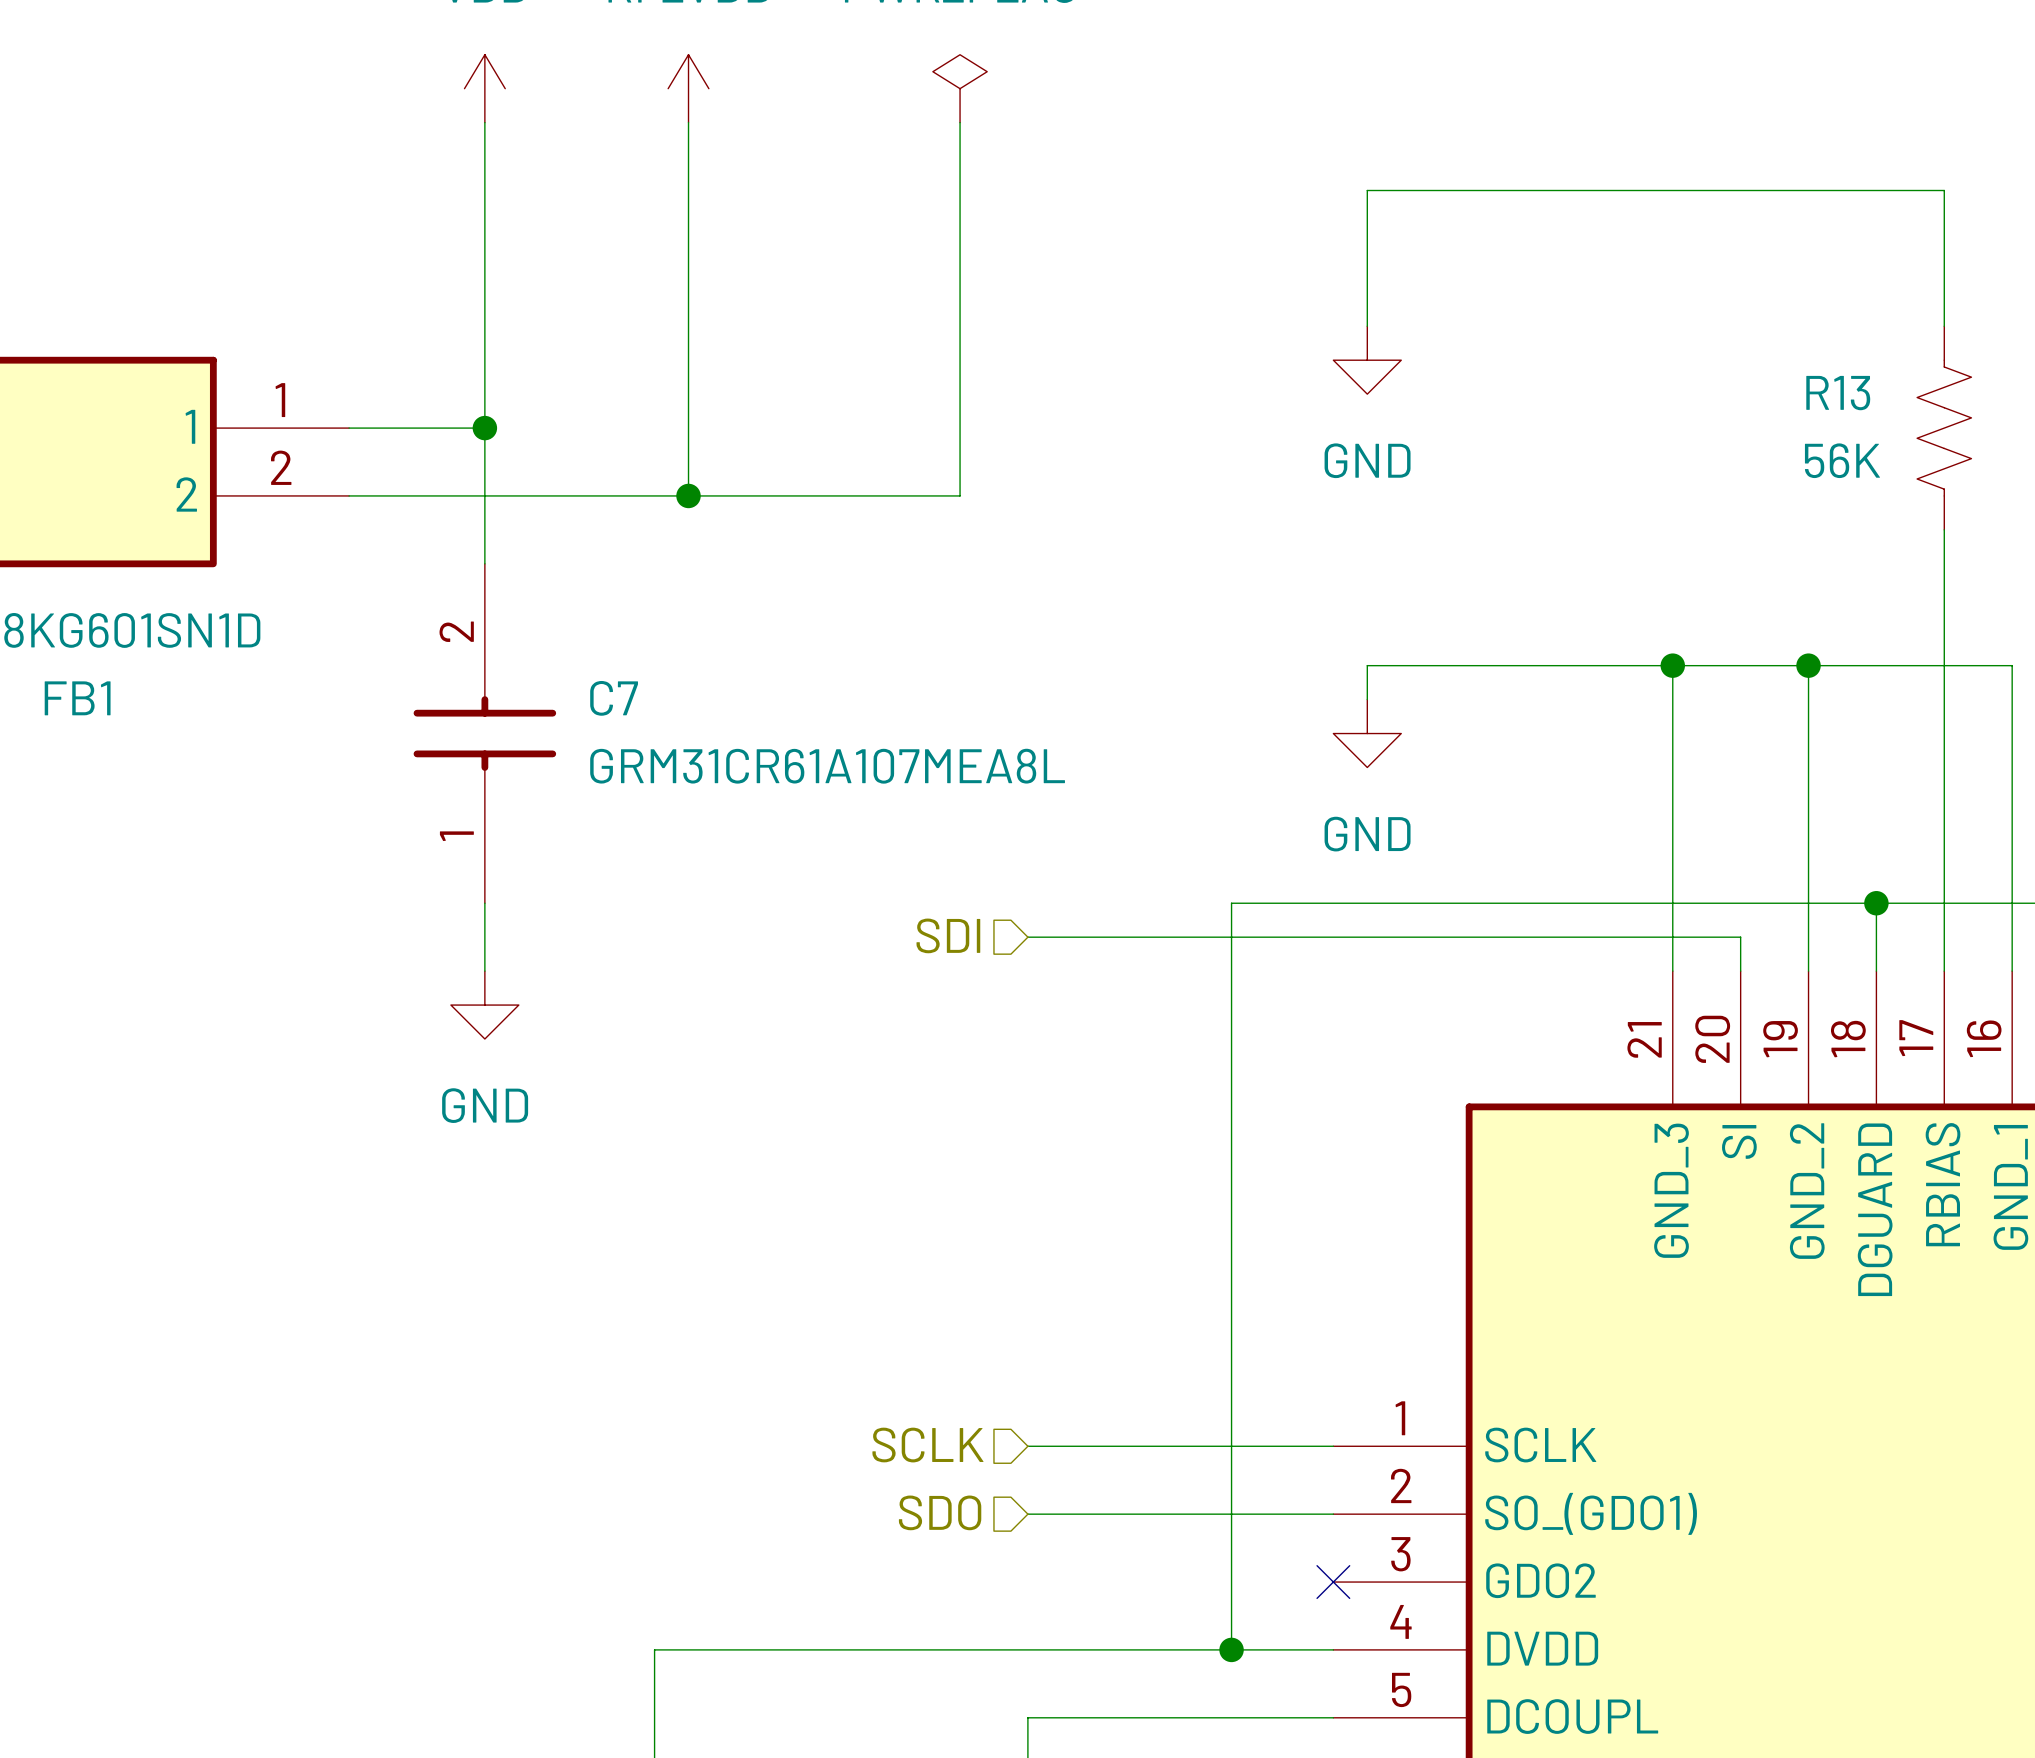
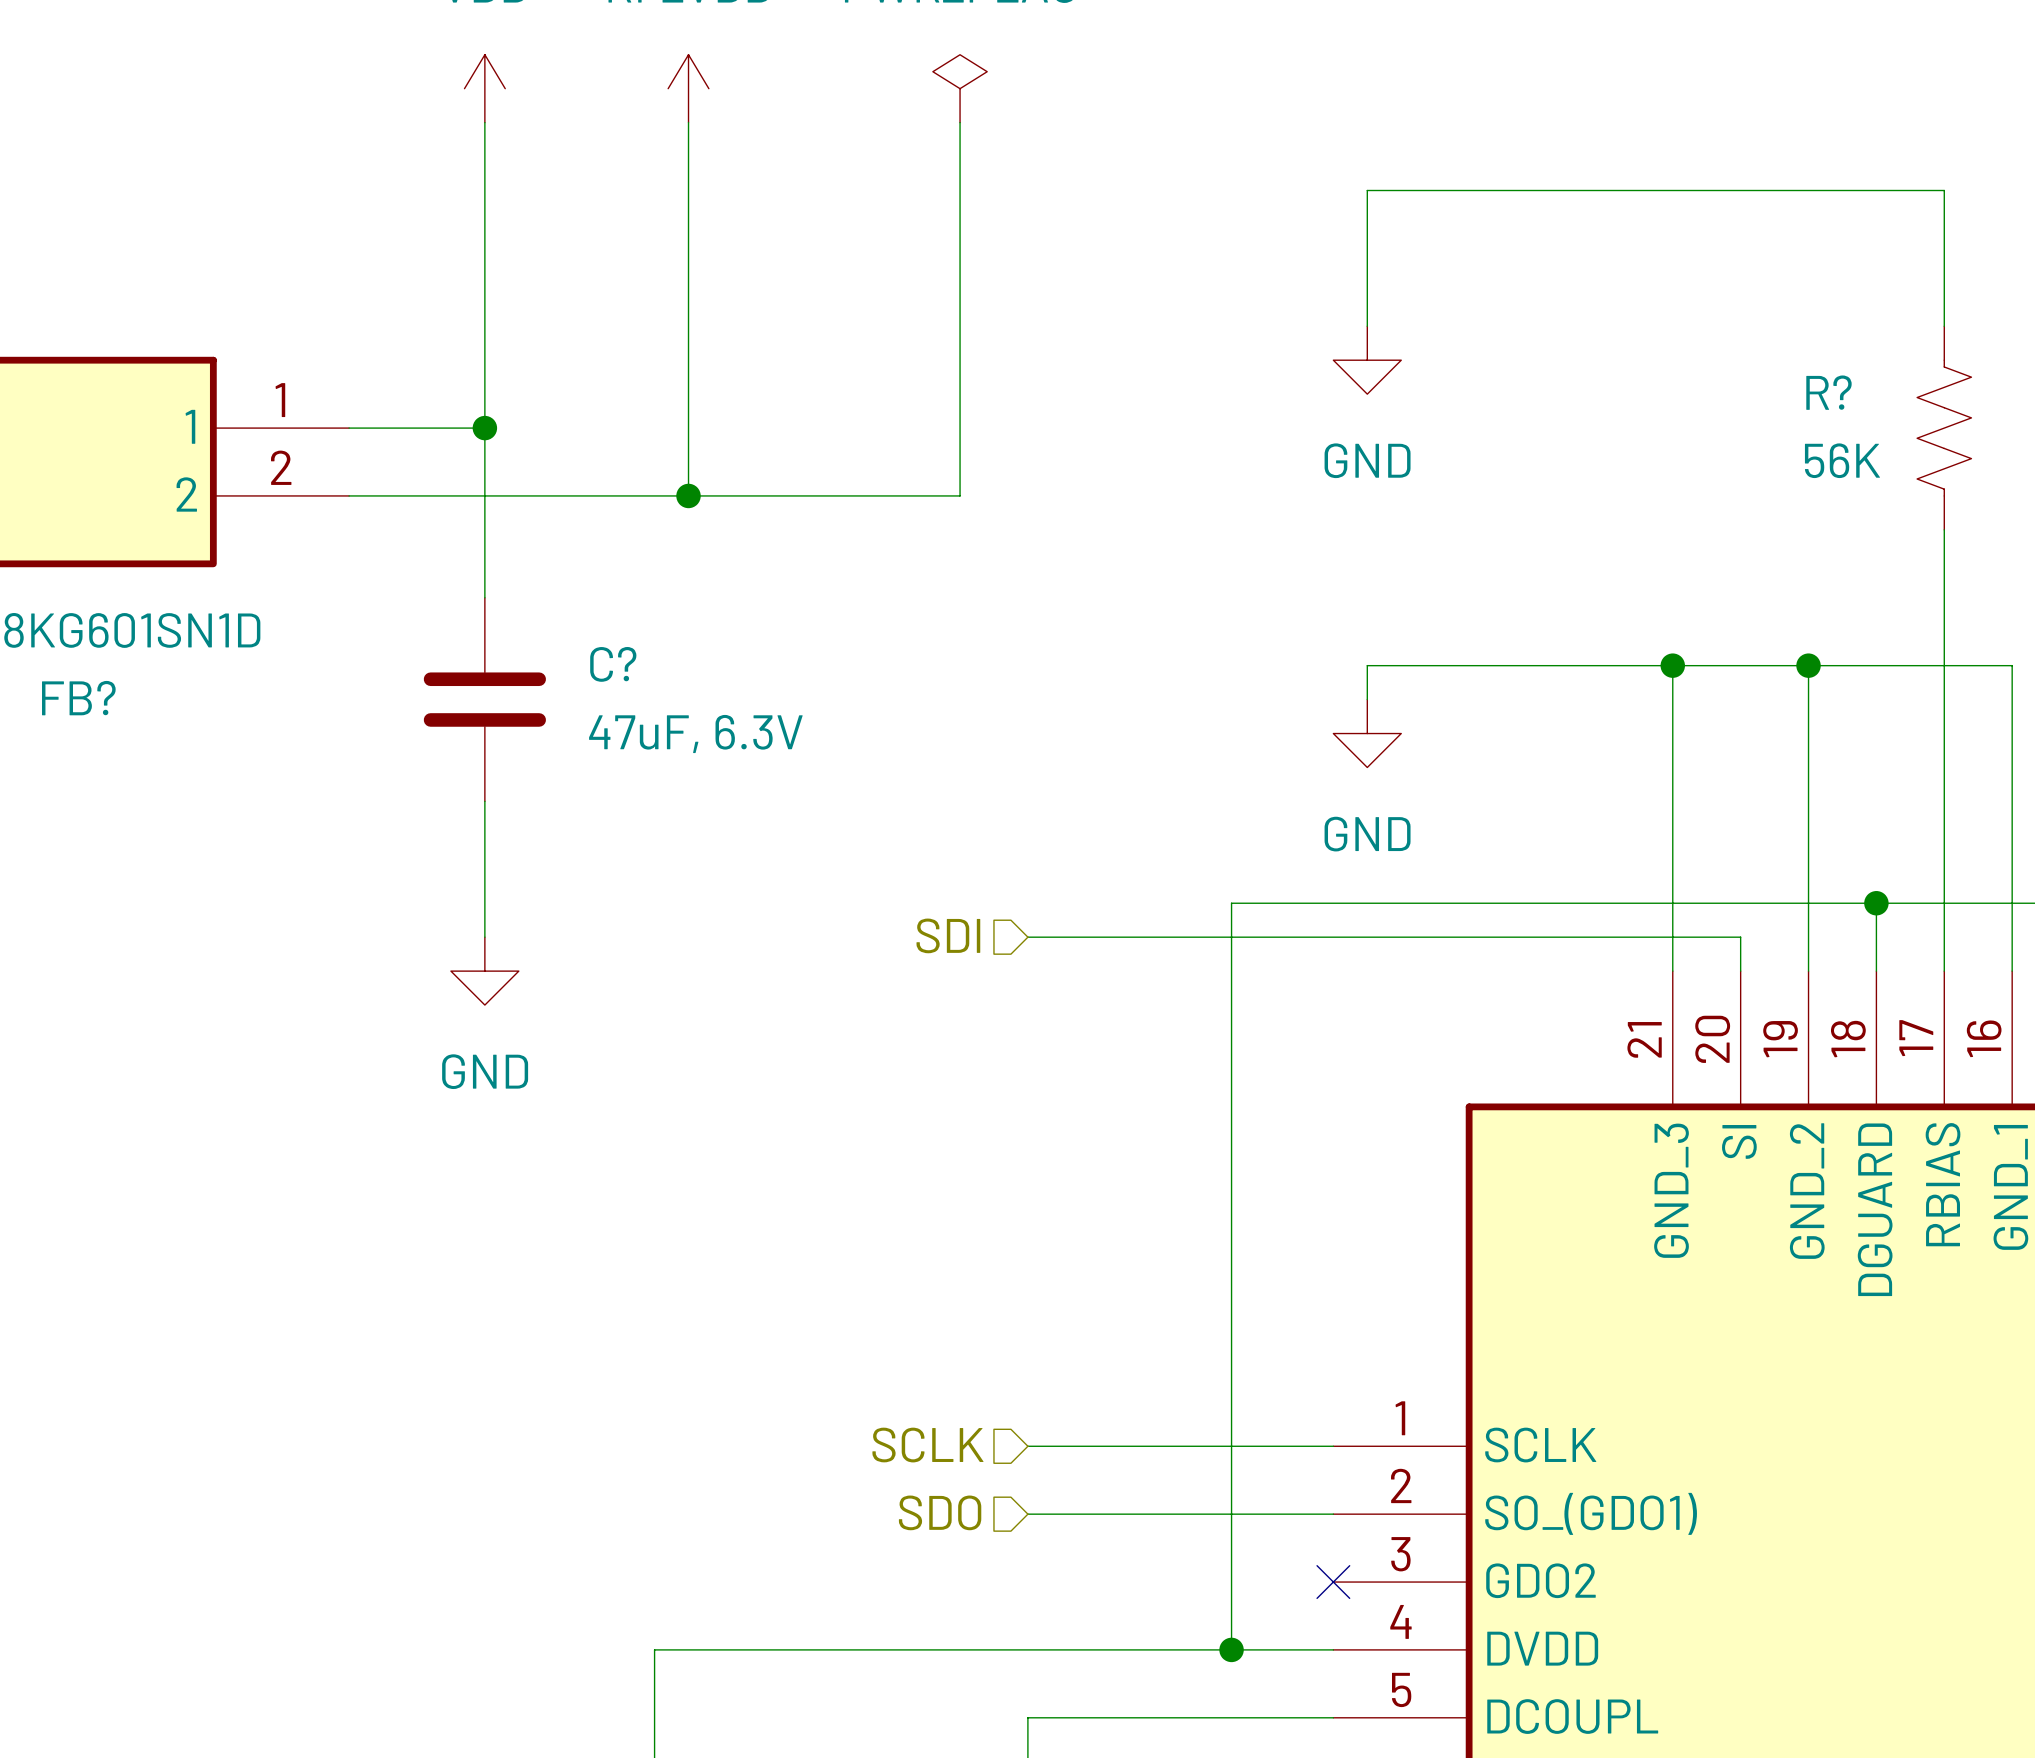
R13 name: R13 (1838, 393) -> R? (1828, 392)
FB1 name: FB1 (77, 698) -> FB? (78, 698)
C?: none -> 47uF, 6.3V (484, 699)
C7: GRM31CR61A107MEA8L (484, 733) -> none
power symbol position: GND (484, 1005) -> GND (484, 971)

